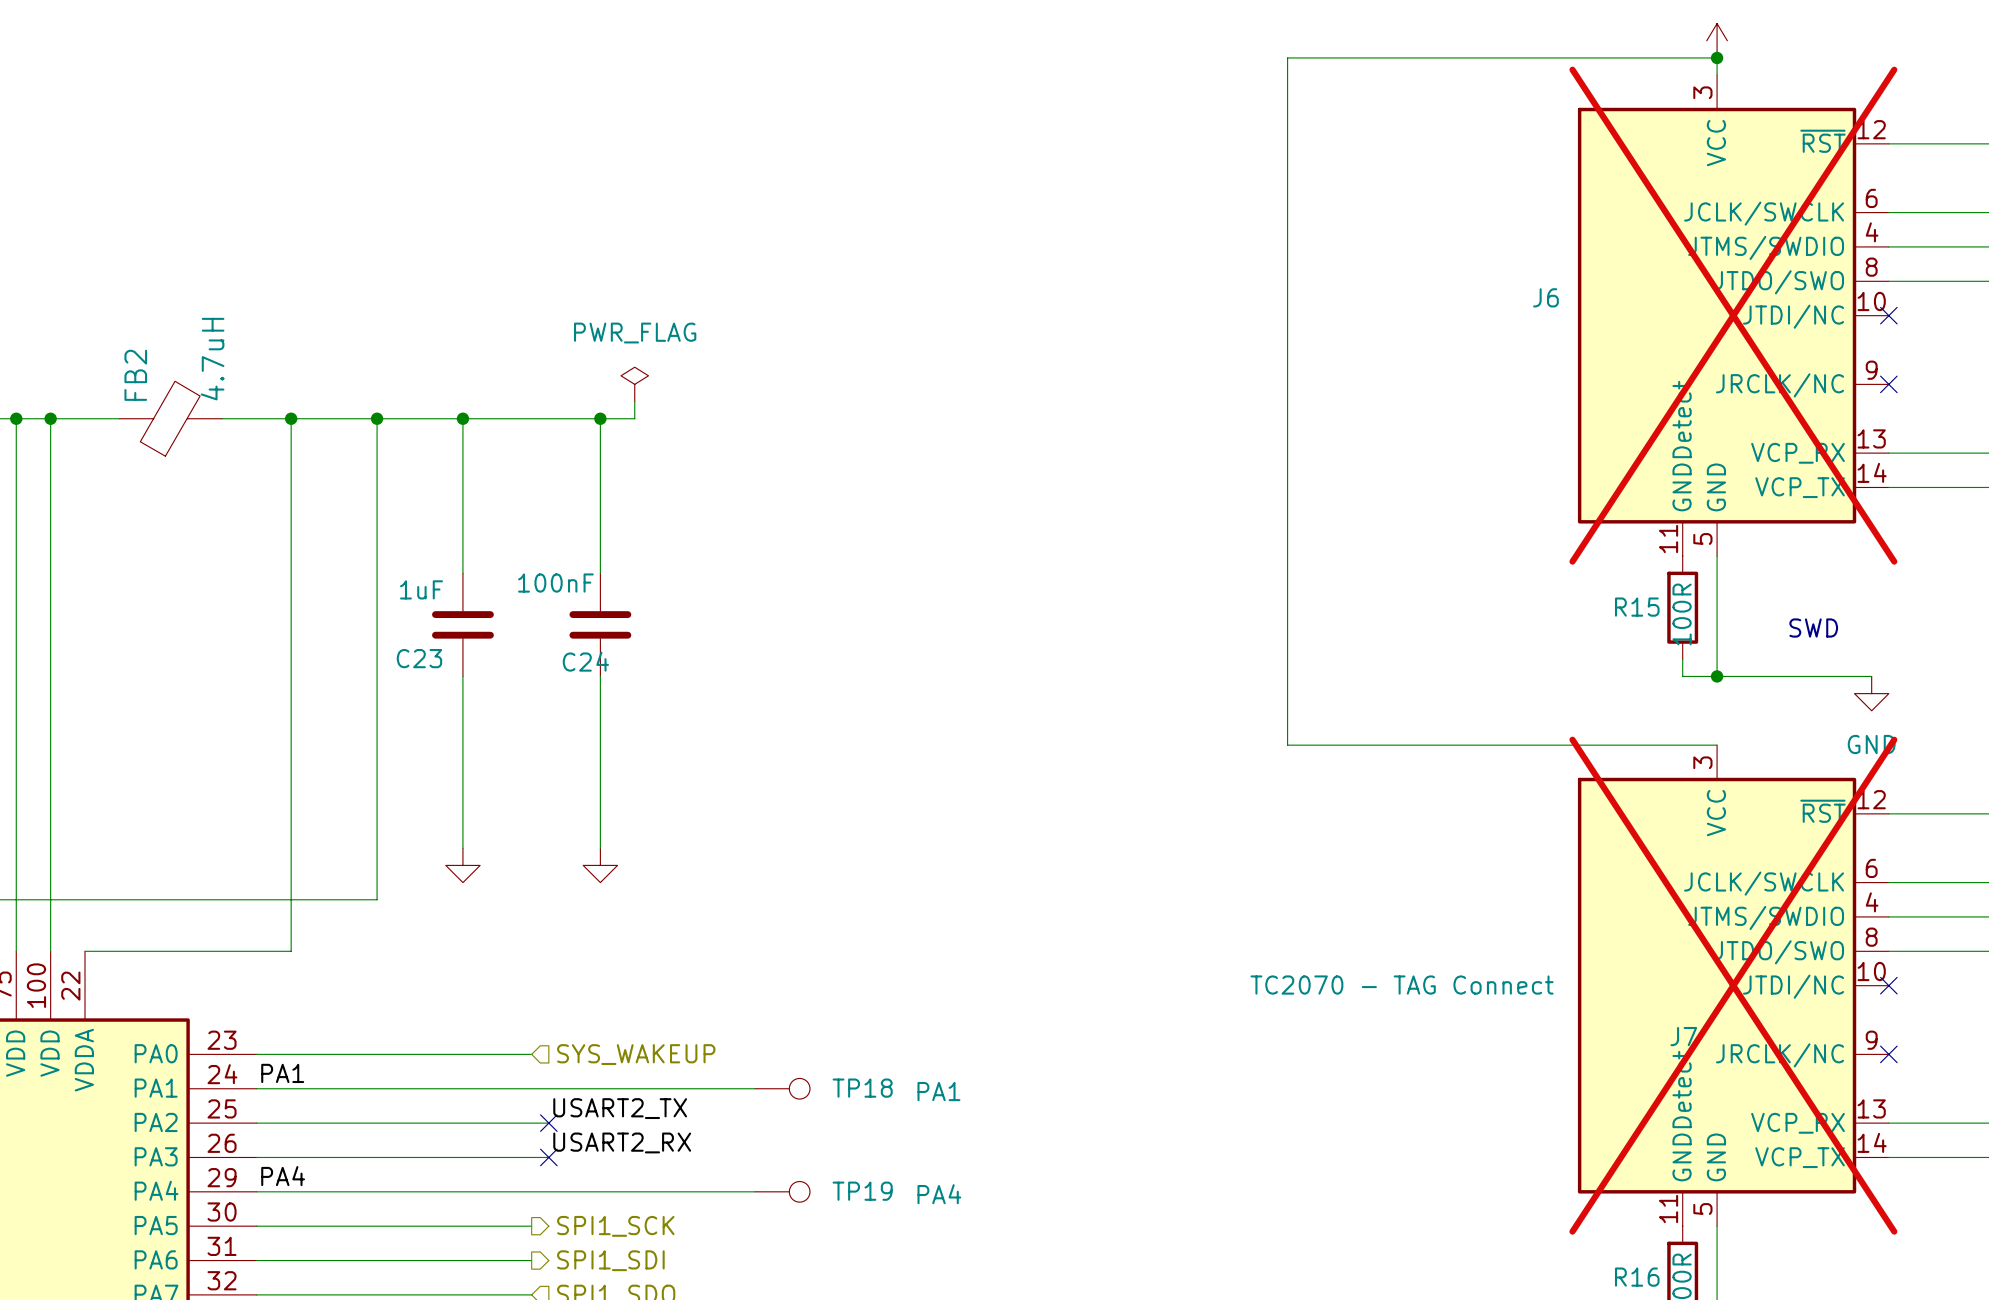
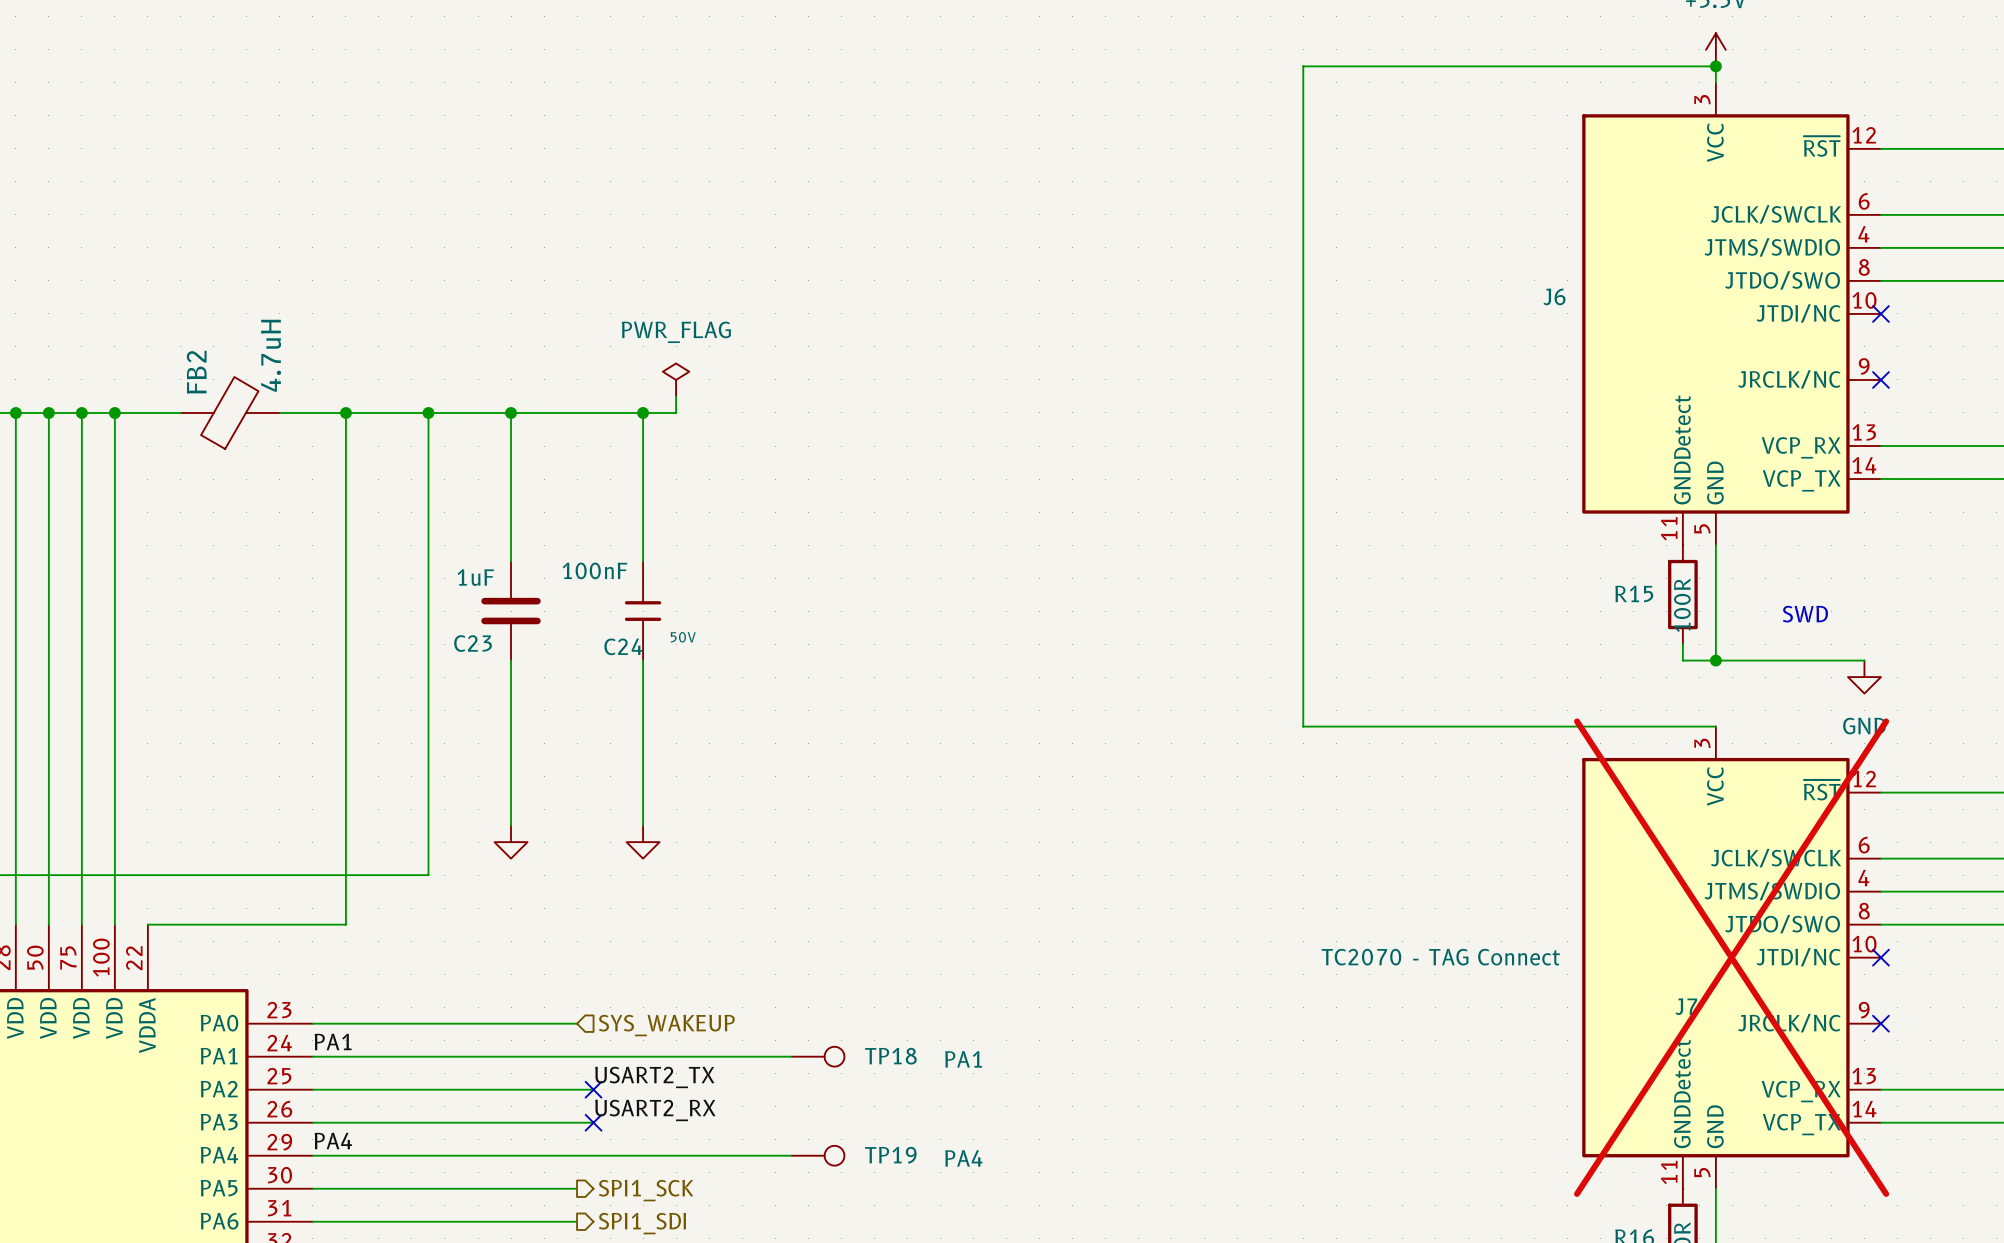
J6 do-not-place cross: (1733, 315) -> none
C24 symbol: [569, 573, 632, 677] -> [624, 561, 662, 661]
C24 text: none -> 50V (683, 637)

